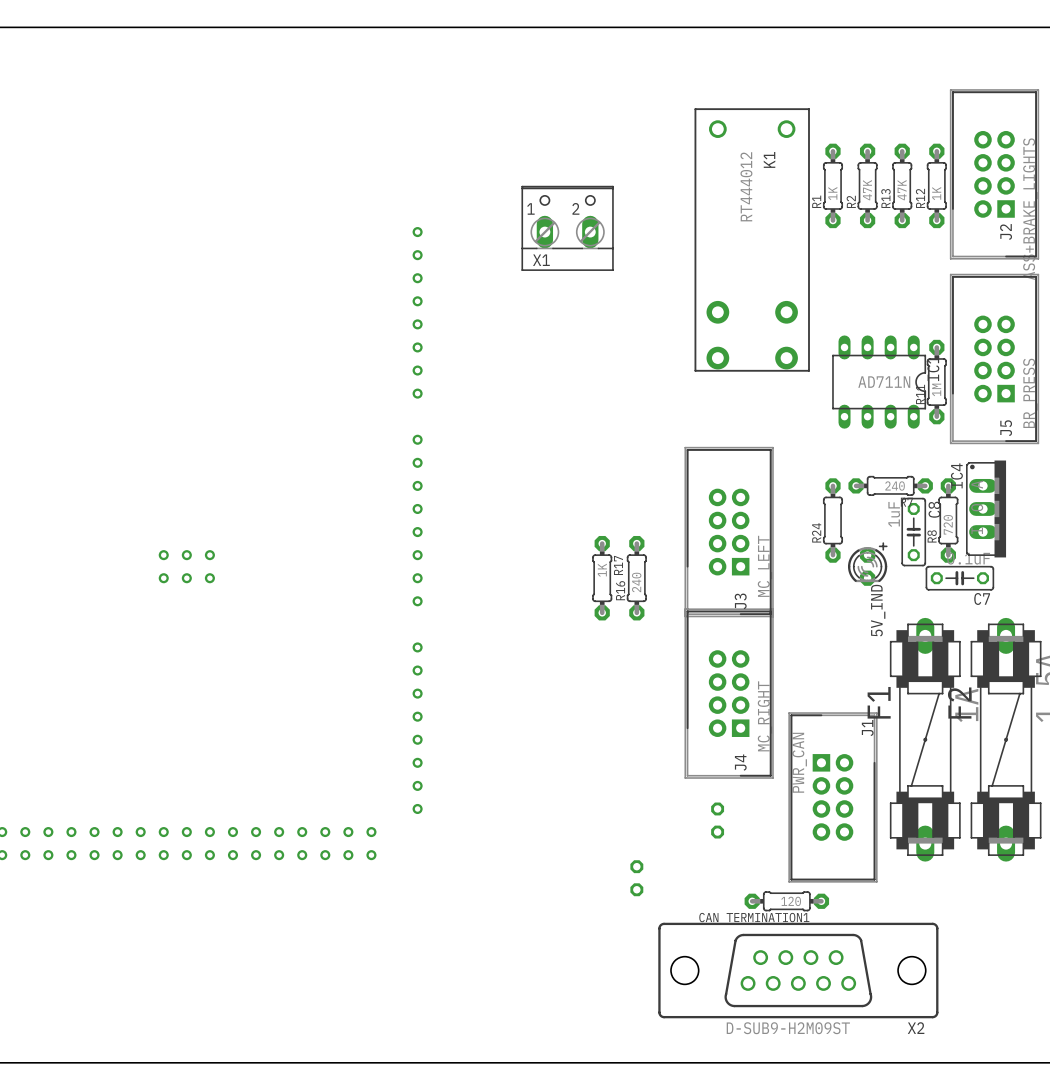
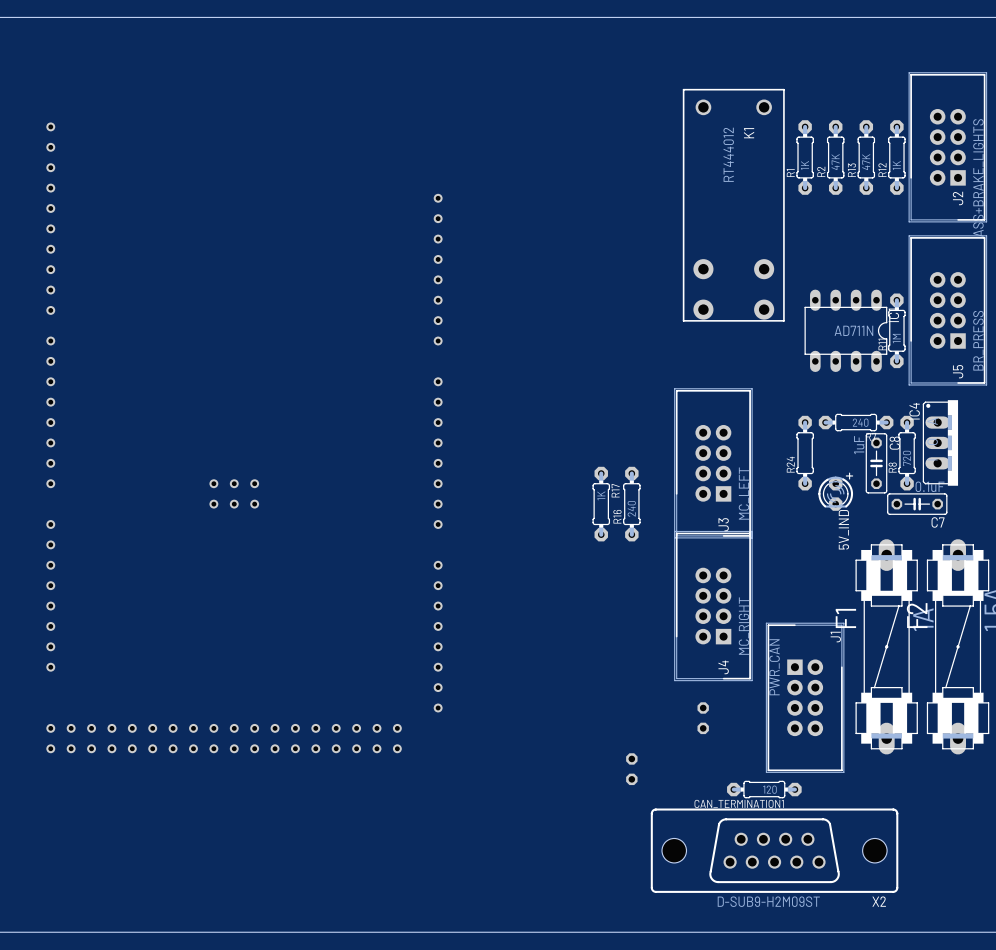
X1: (567, 228) -> none

